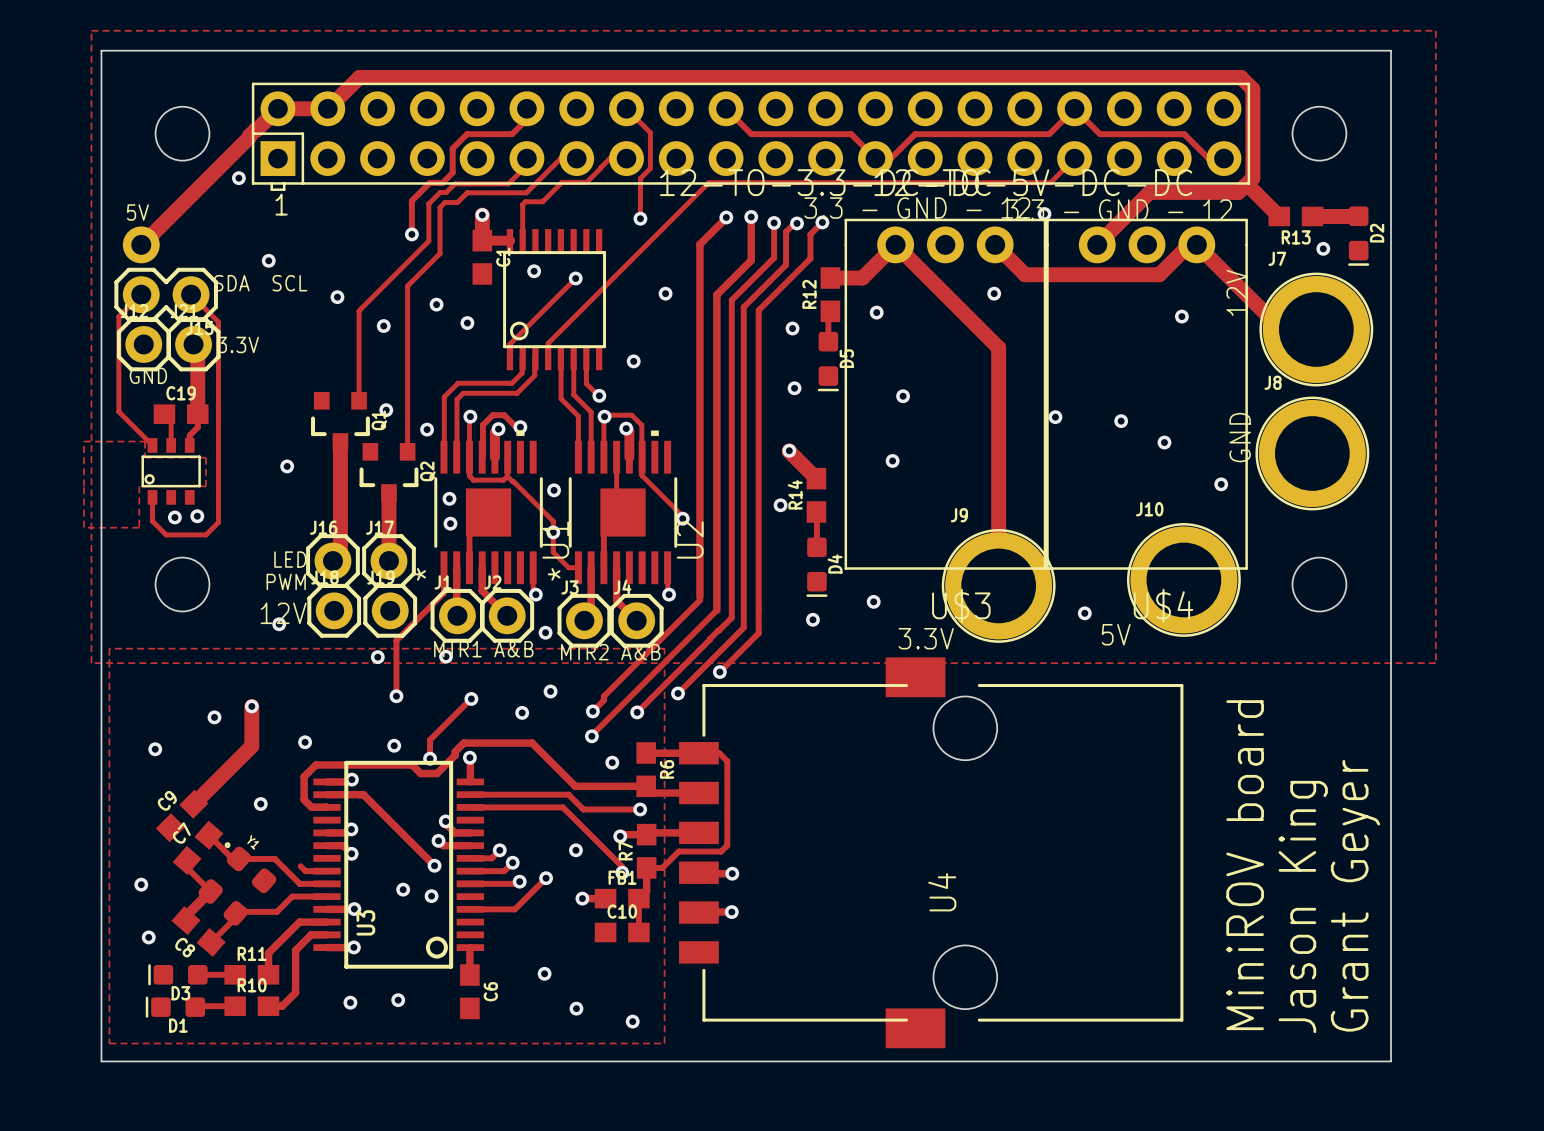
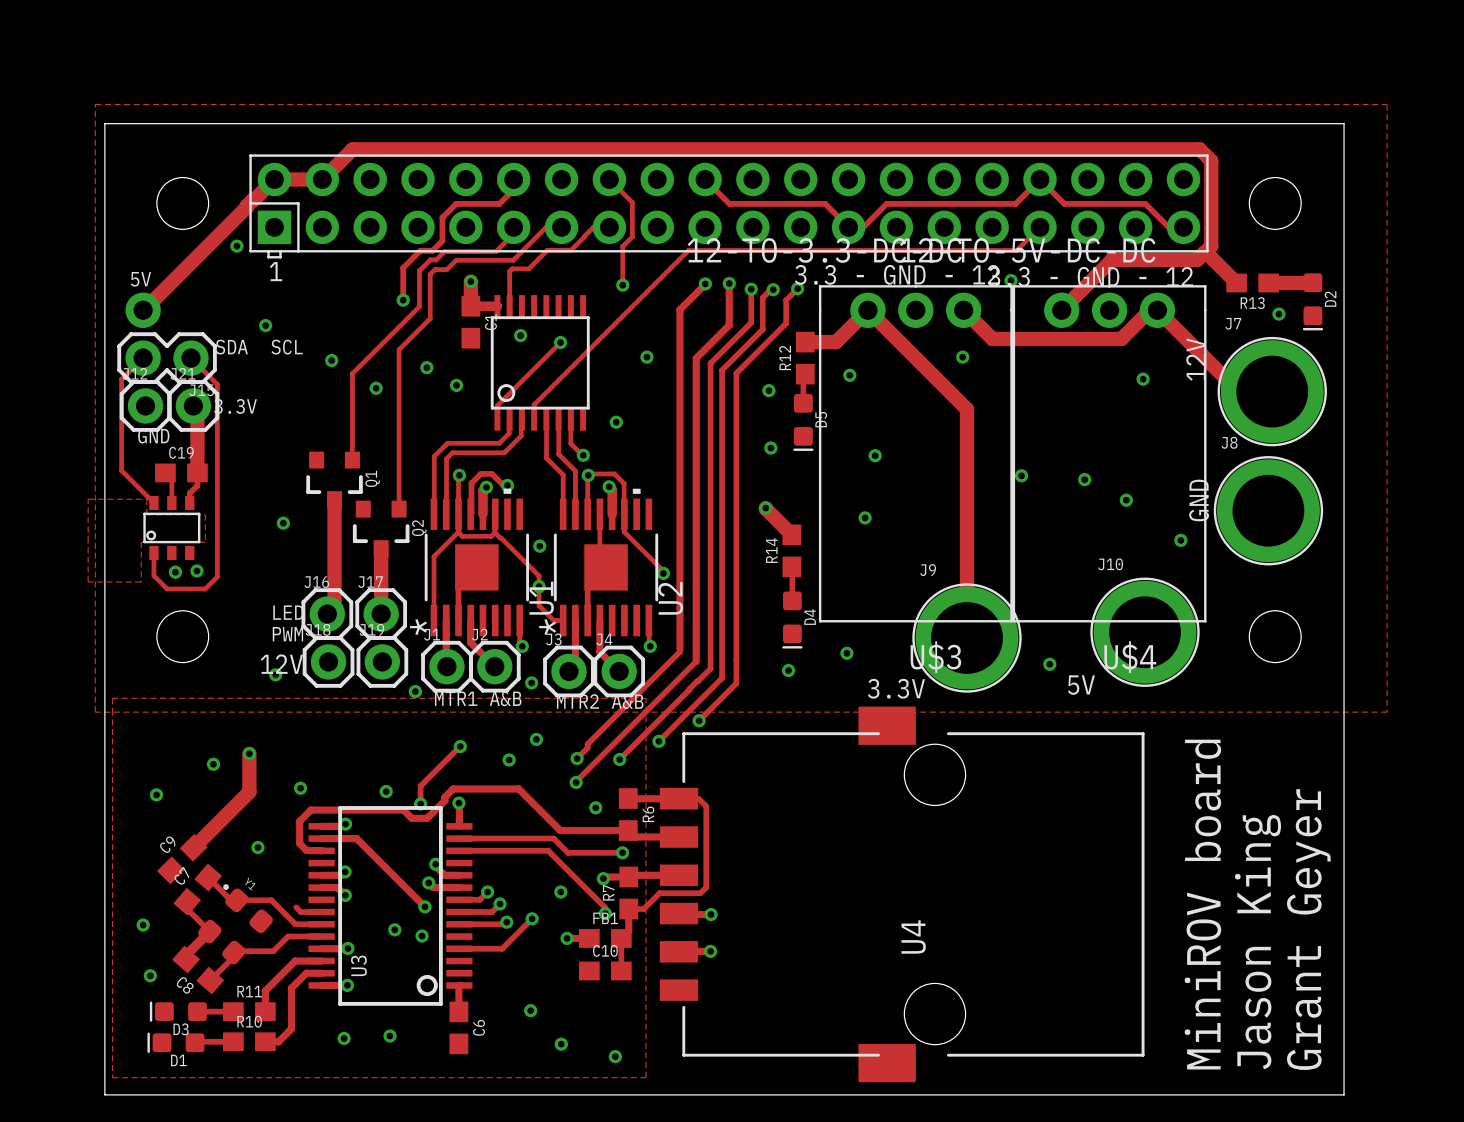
via: (386, 410) -> none
via: (427, 429) -> none
via: (449, 498) -> none
via: (780, 505) -> none
via: (450, 523) -> none
track: (443, 567) (443, 593) (396, 640) (396, 696) -> (434, 620) (434, 556) (458, 531)
via: none -> (415, 691)
via: (446, 656) -> none
via: (377, 657) -> none
via: (396, 696) -> none

